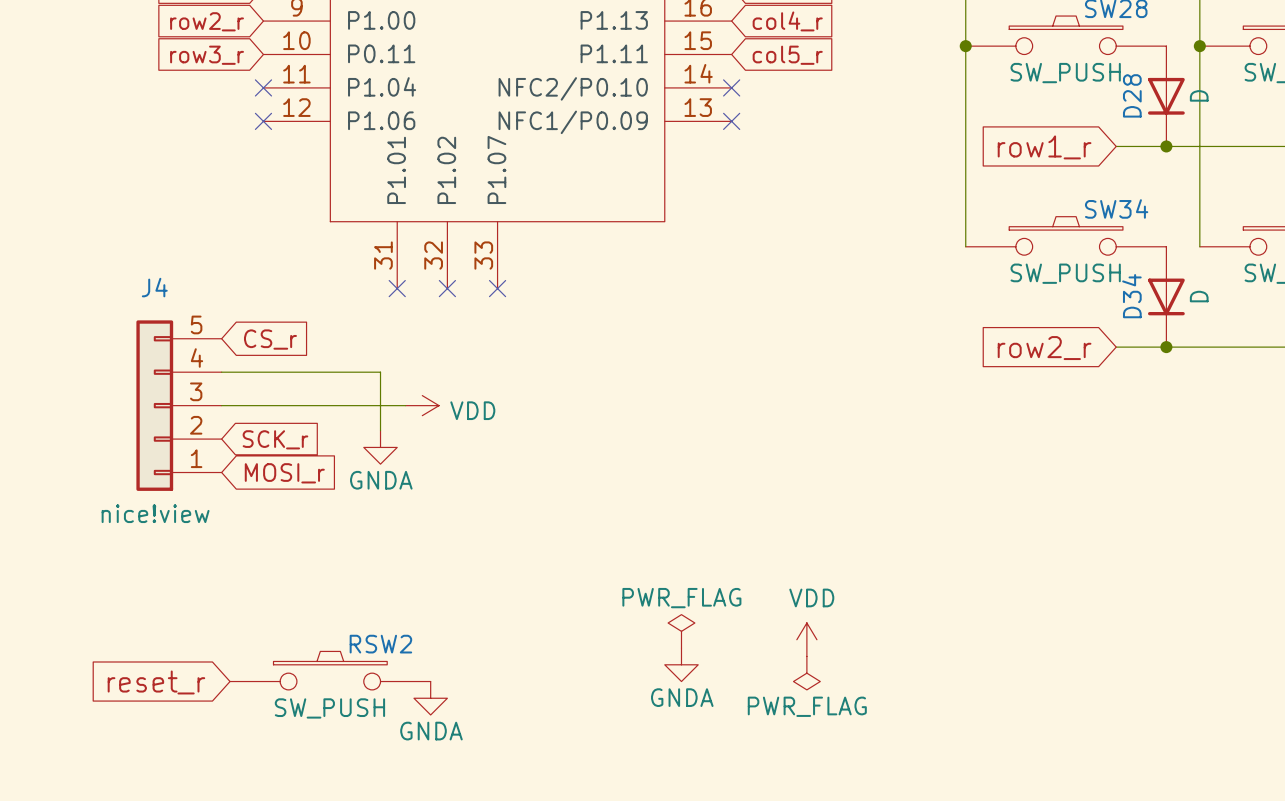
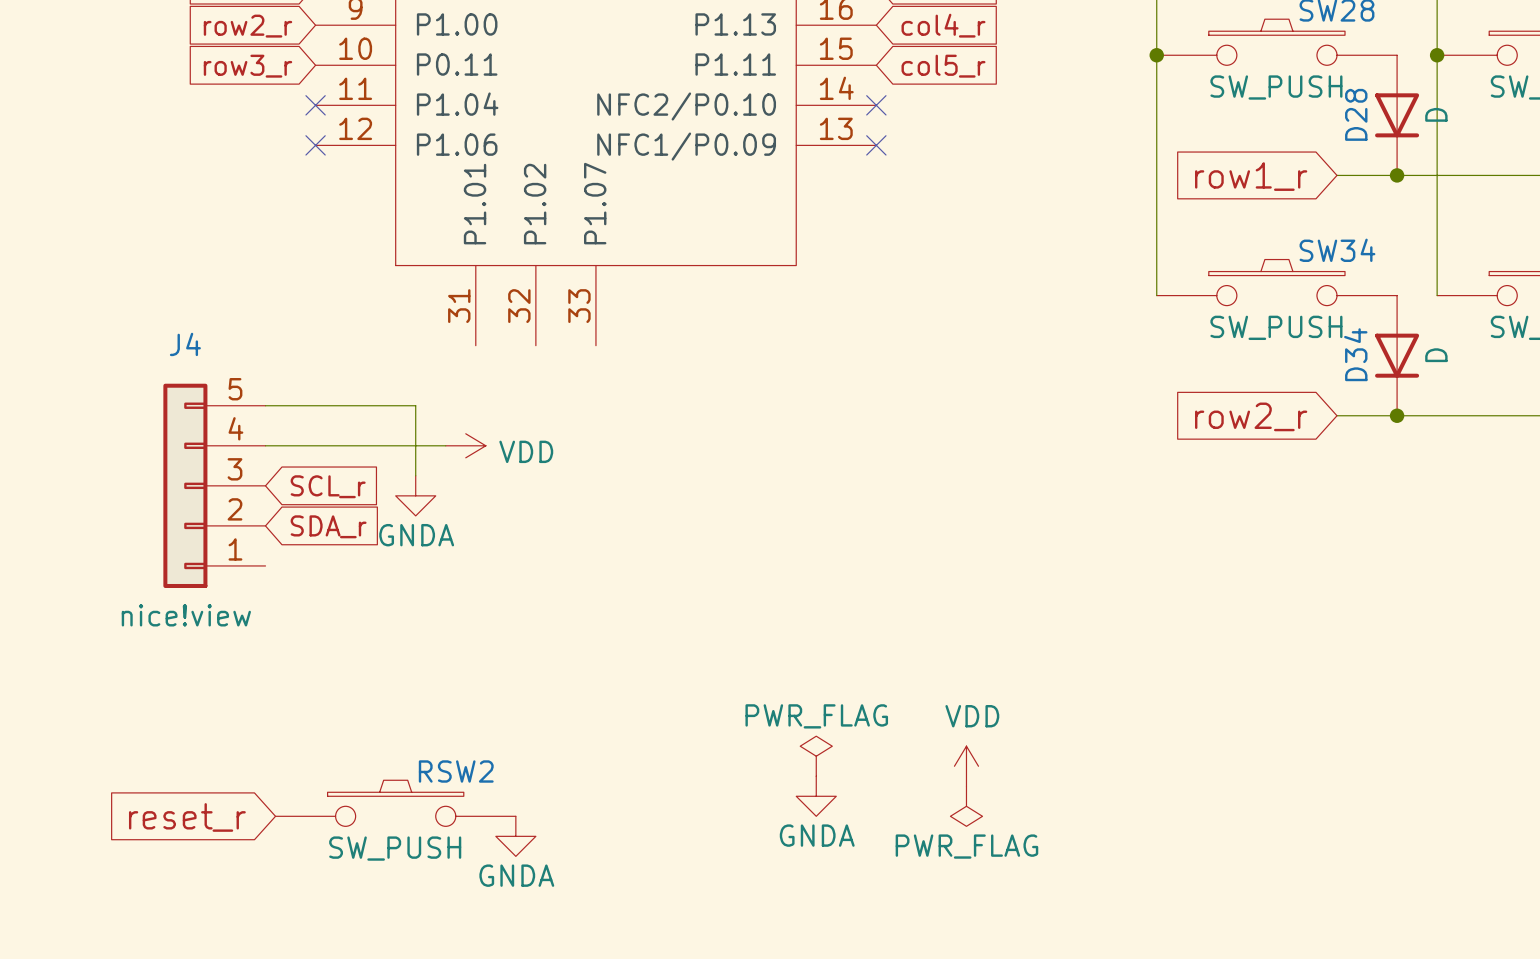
no-connect mark: (397, 288) -> none
no-connect mark: (447, 288) -> none
no-connect mark: (497, 288) -> none
wire: none -> (265, 405) (415, 405) (415, 475)
global label: CS_r (270, 339) -> none
wire: (372, 372) (380, 372) (380, 430) -> none
wire: (221, 405) (405, 405) -> none
power symbol position: VDD (422, 405) -> VDD (465, 445)
global label: none -> SCL_r (328, 486)
global label: SCK_r (275, 439) -> SDA_r (328, 526)
power symbol position: GNDA (380, 447) -> GNDA (415, 495)
global label: MOSI_r (284, 473) -> none

